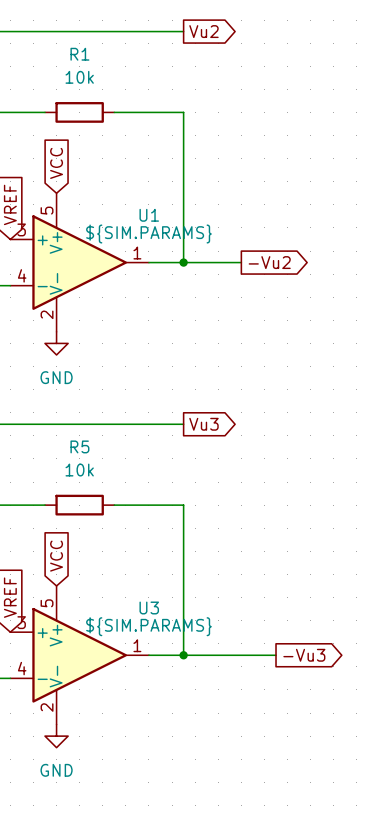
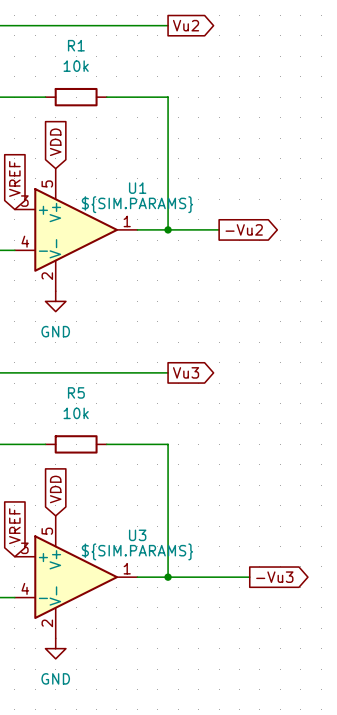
global label: VCC (56, 163) -> VDD (55, 142)
global label: VCC (56, 556) -> VDD (55, 489)

